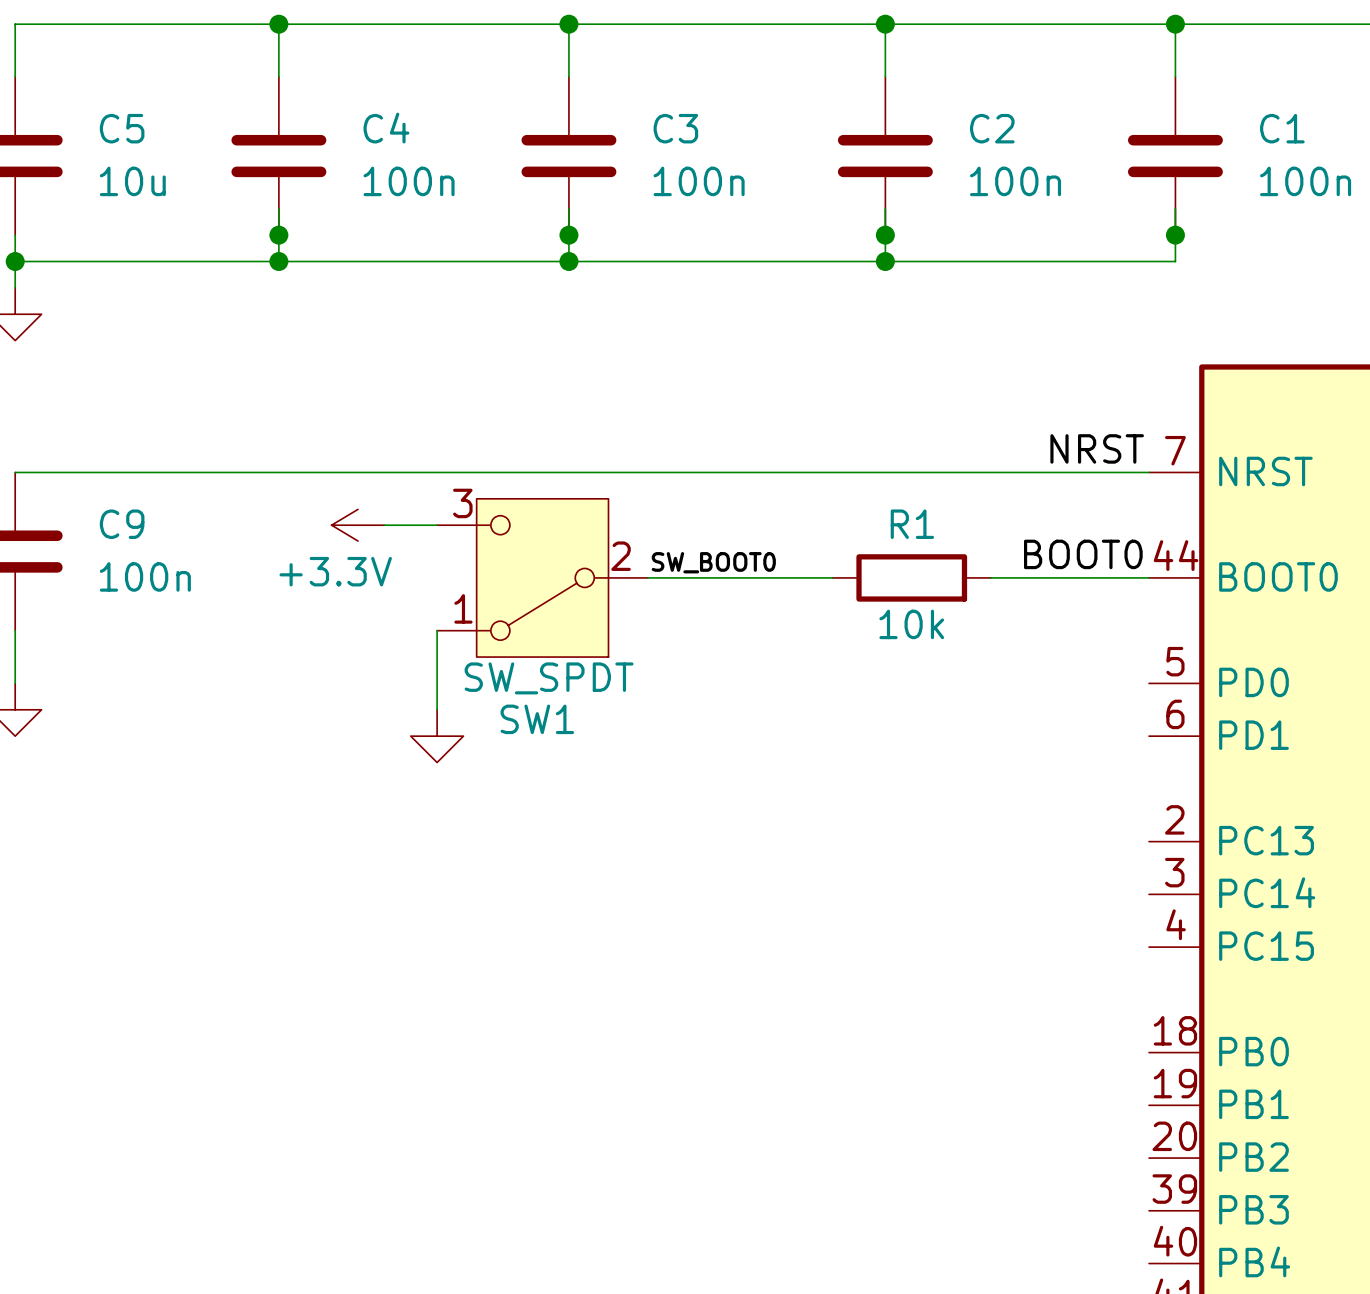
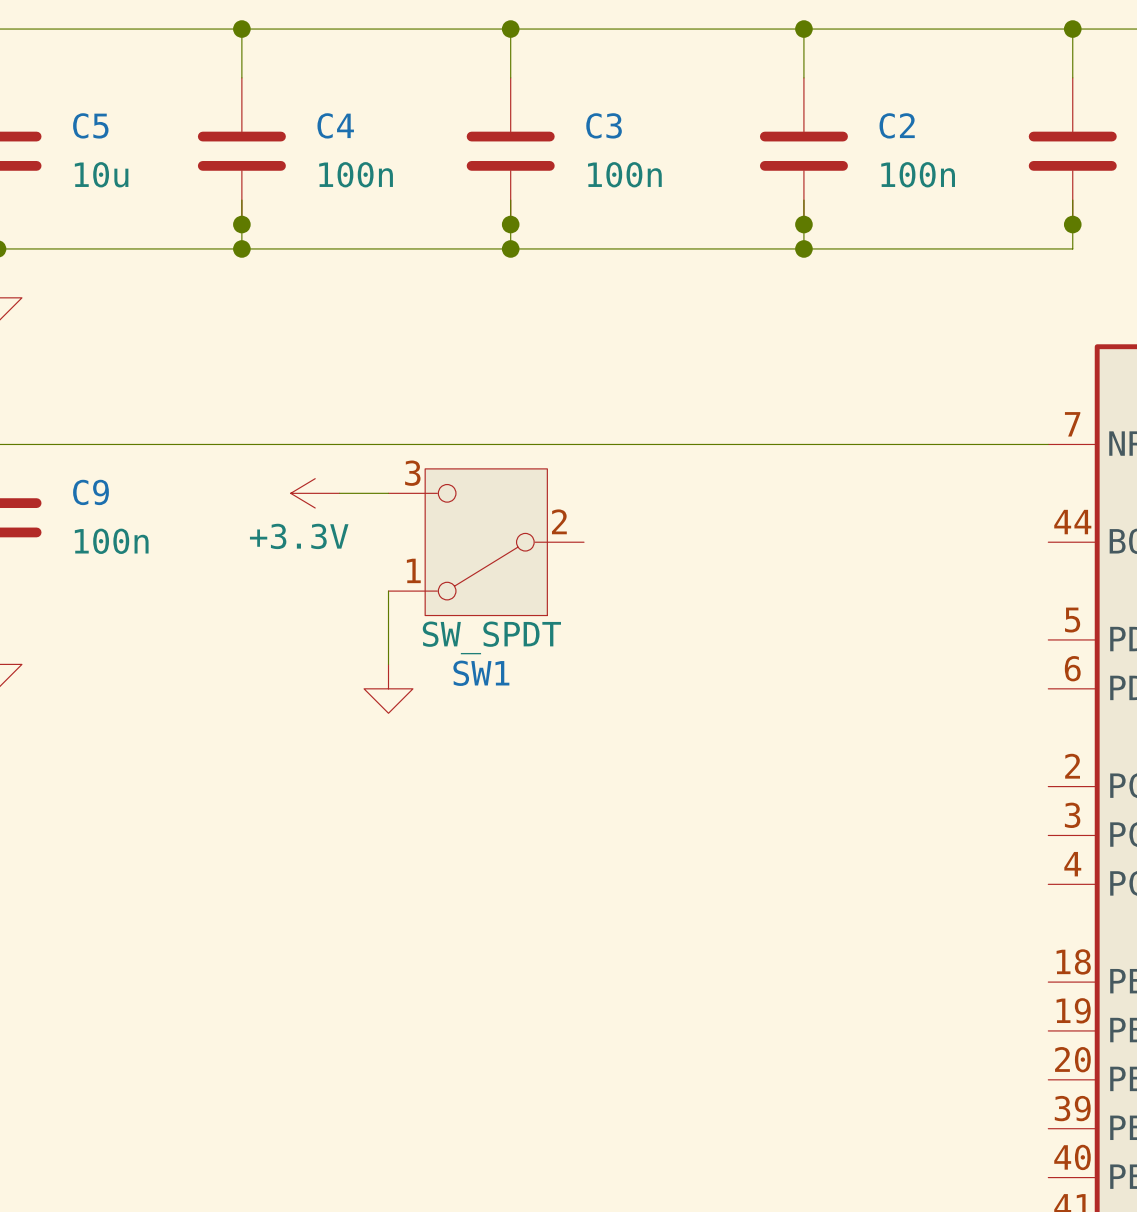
label: NRST (1097, 448) -> none
label: BOOT0 (1083, 554) -> none
label: SW_BOOT0 (713, 562) -> none
wire: (648, 577) (832, 577) -> none
R1: 10k (911, 577) -> none
wire: (990, 577) (1149, 577) -> none

